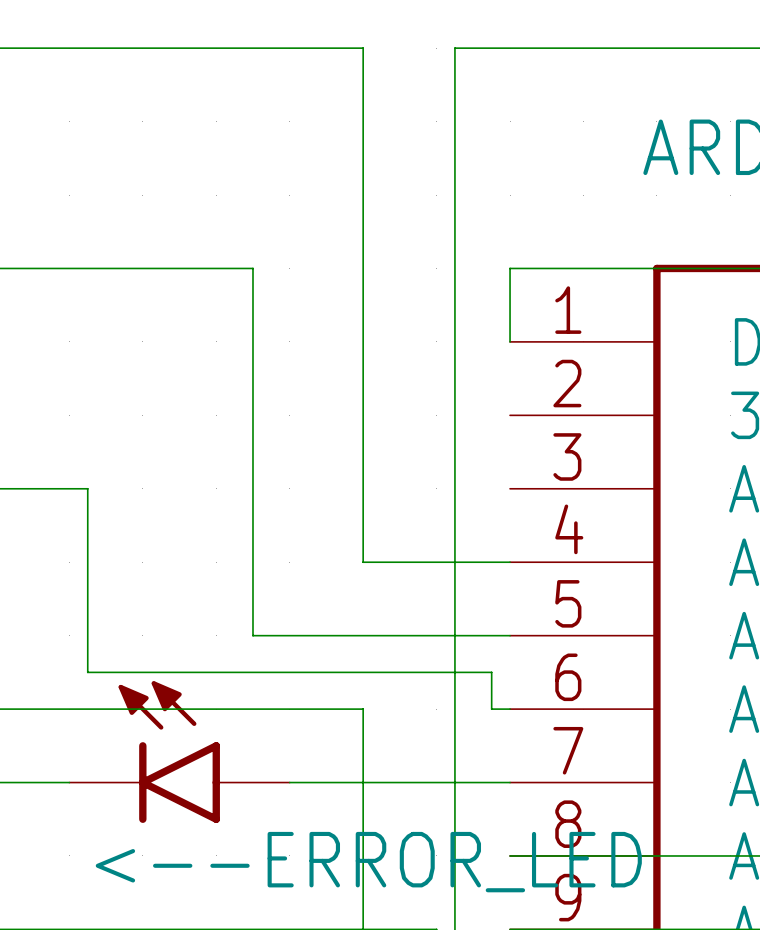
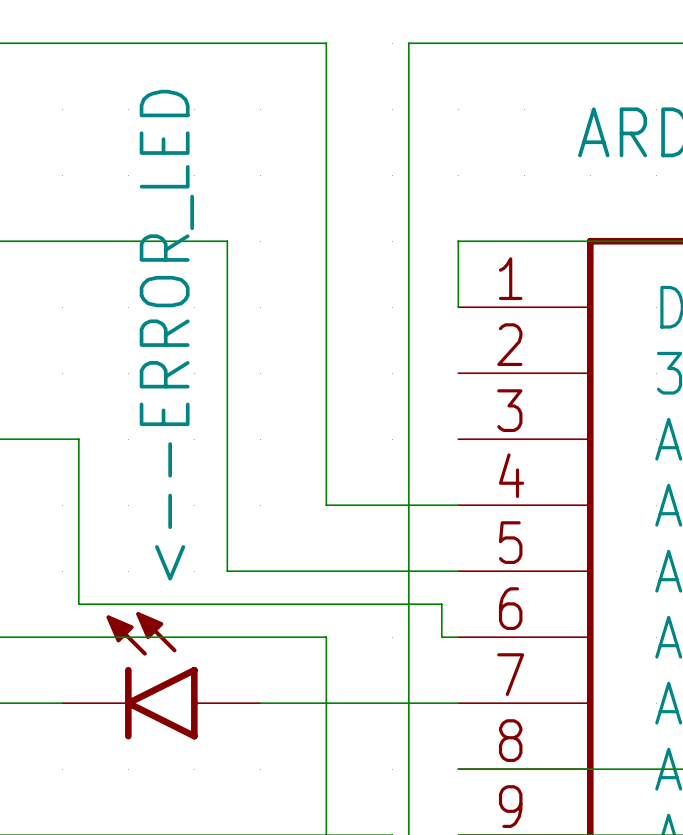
<--ERROR_LED name rotation: 0° (368, 862) -> 90° counterclockwise (166, 335)

